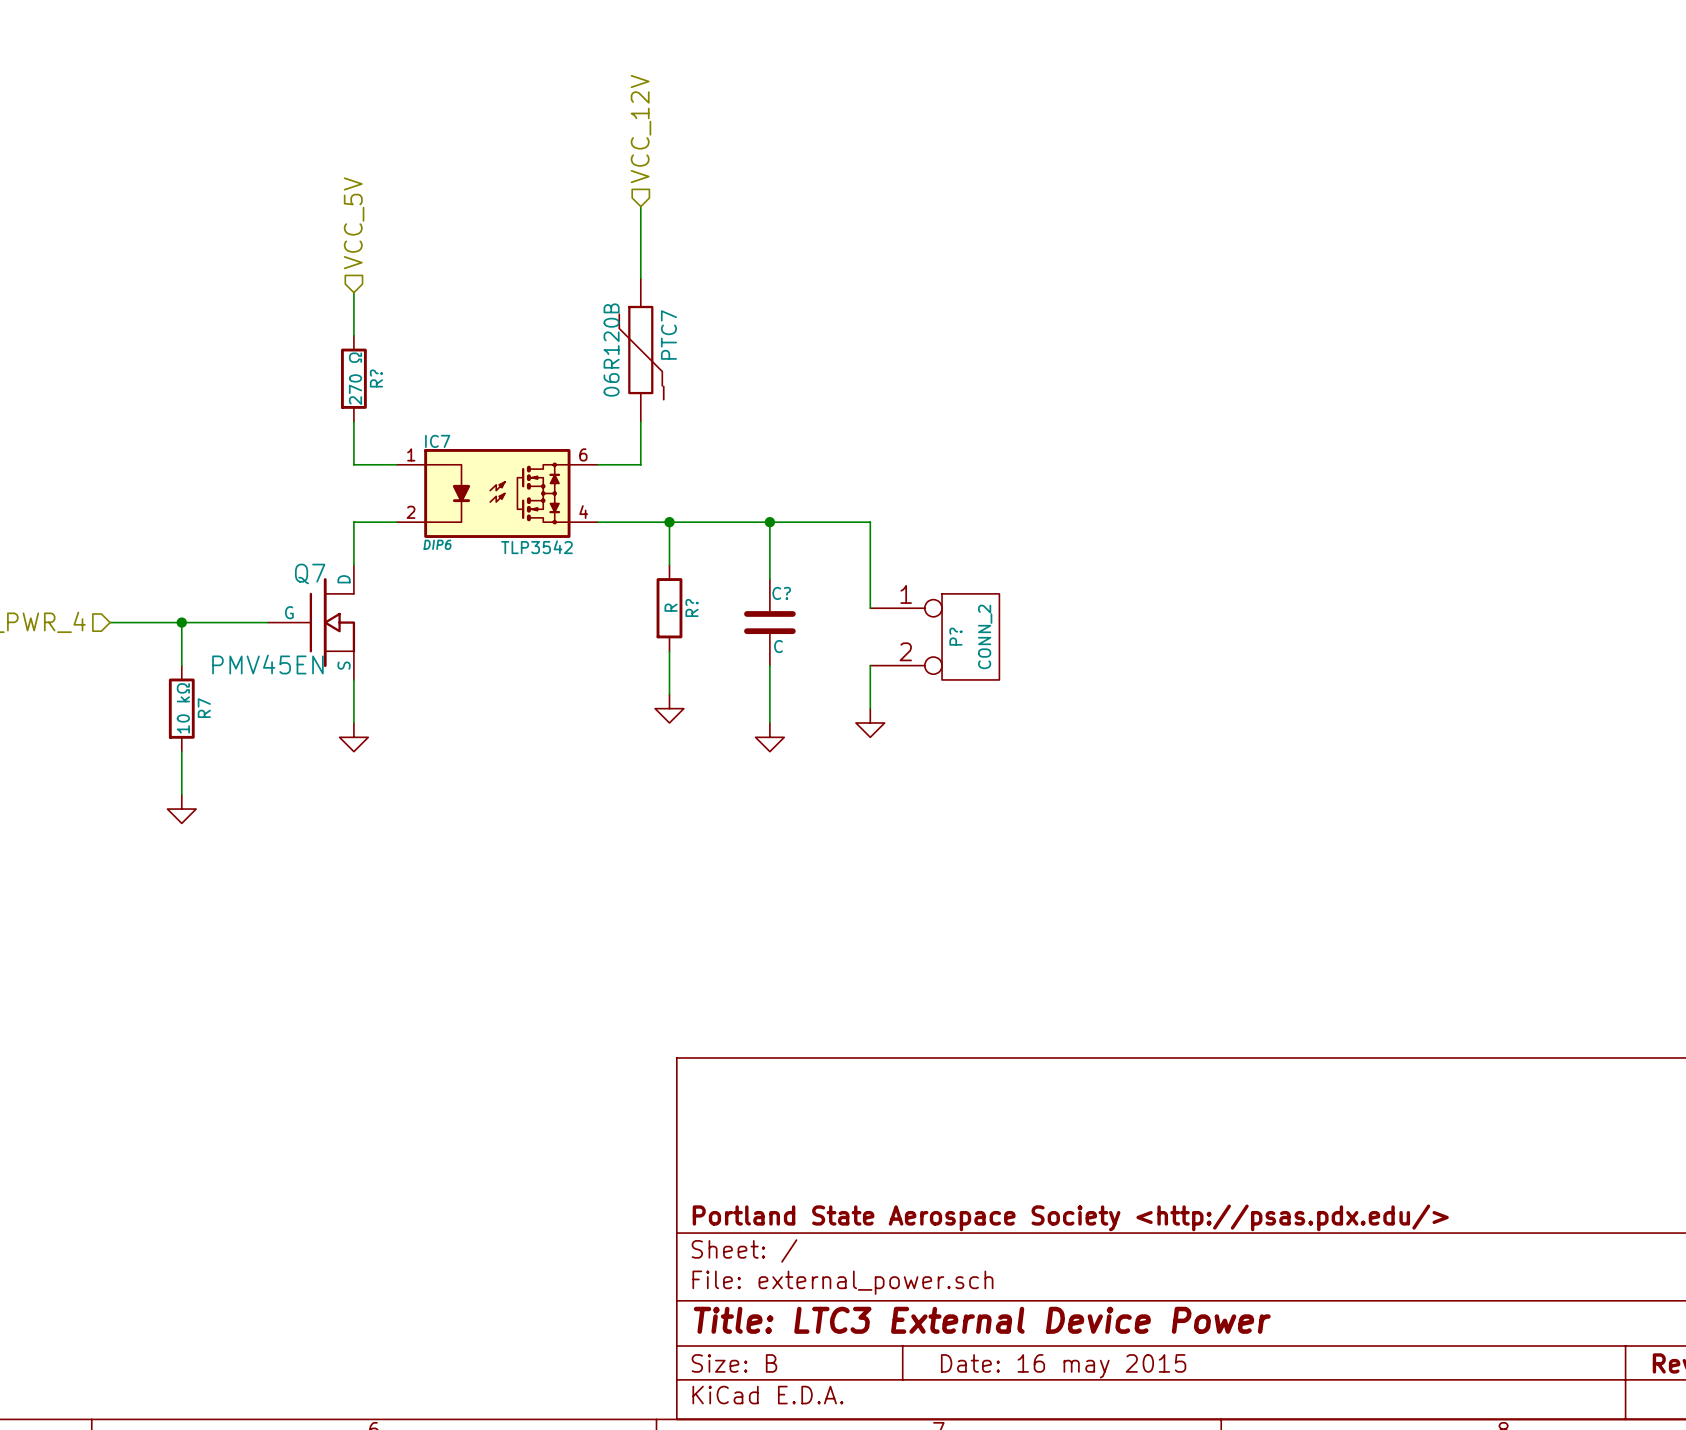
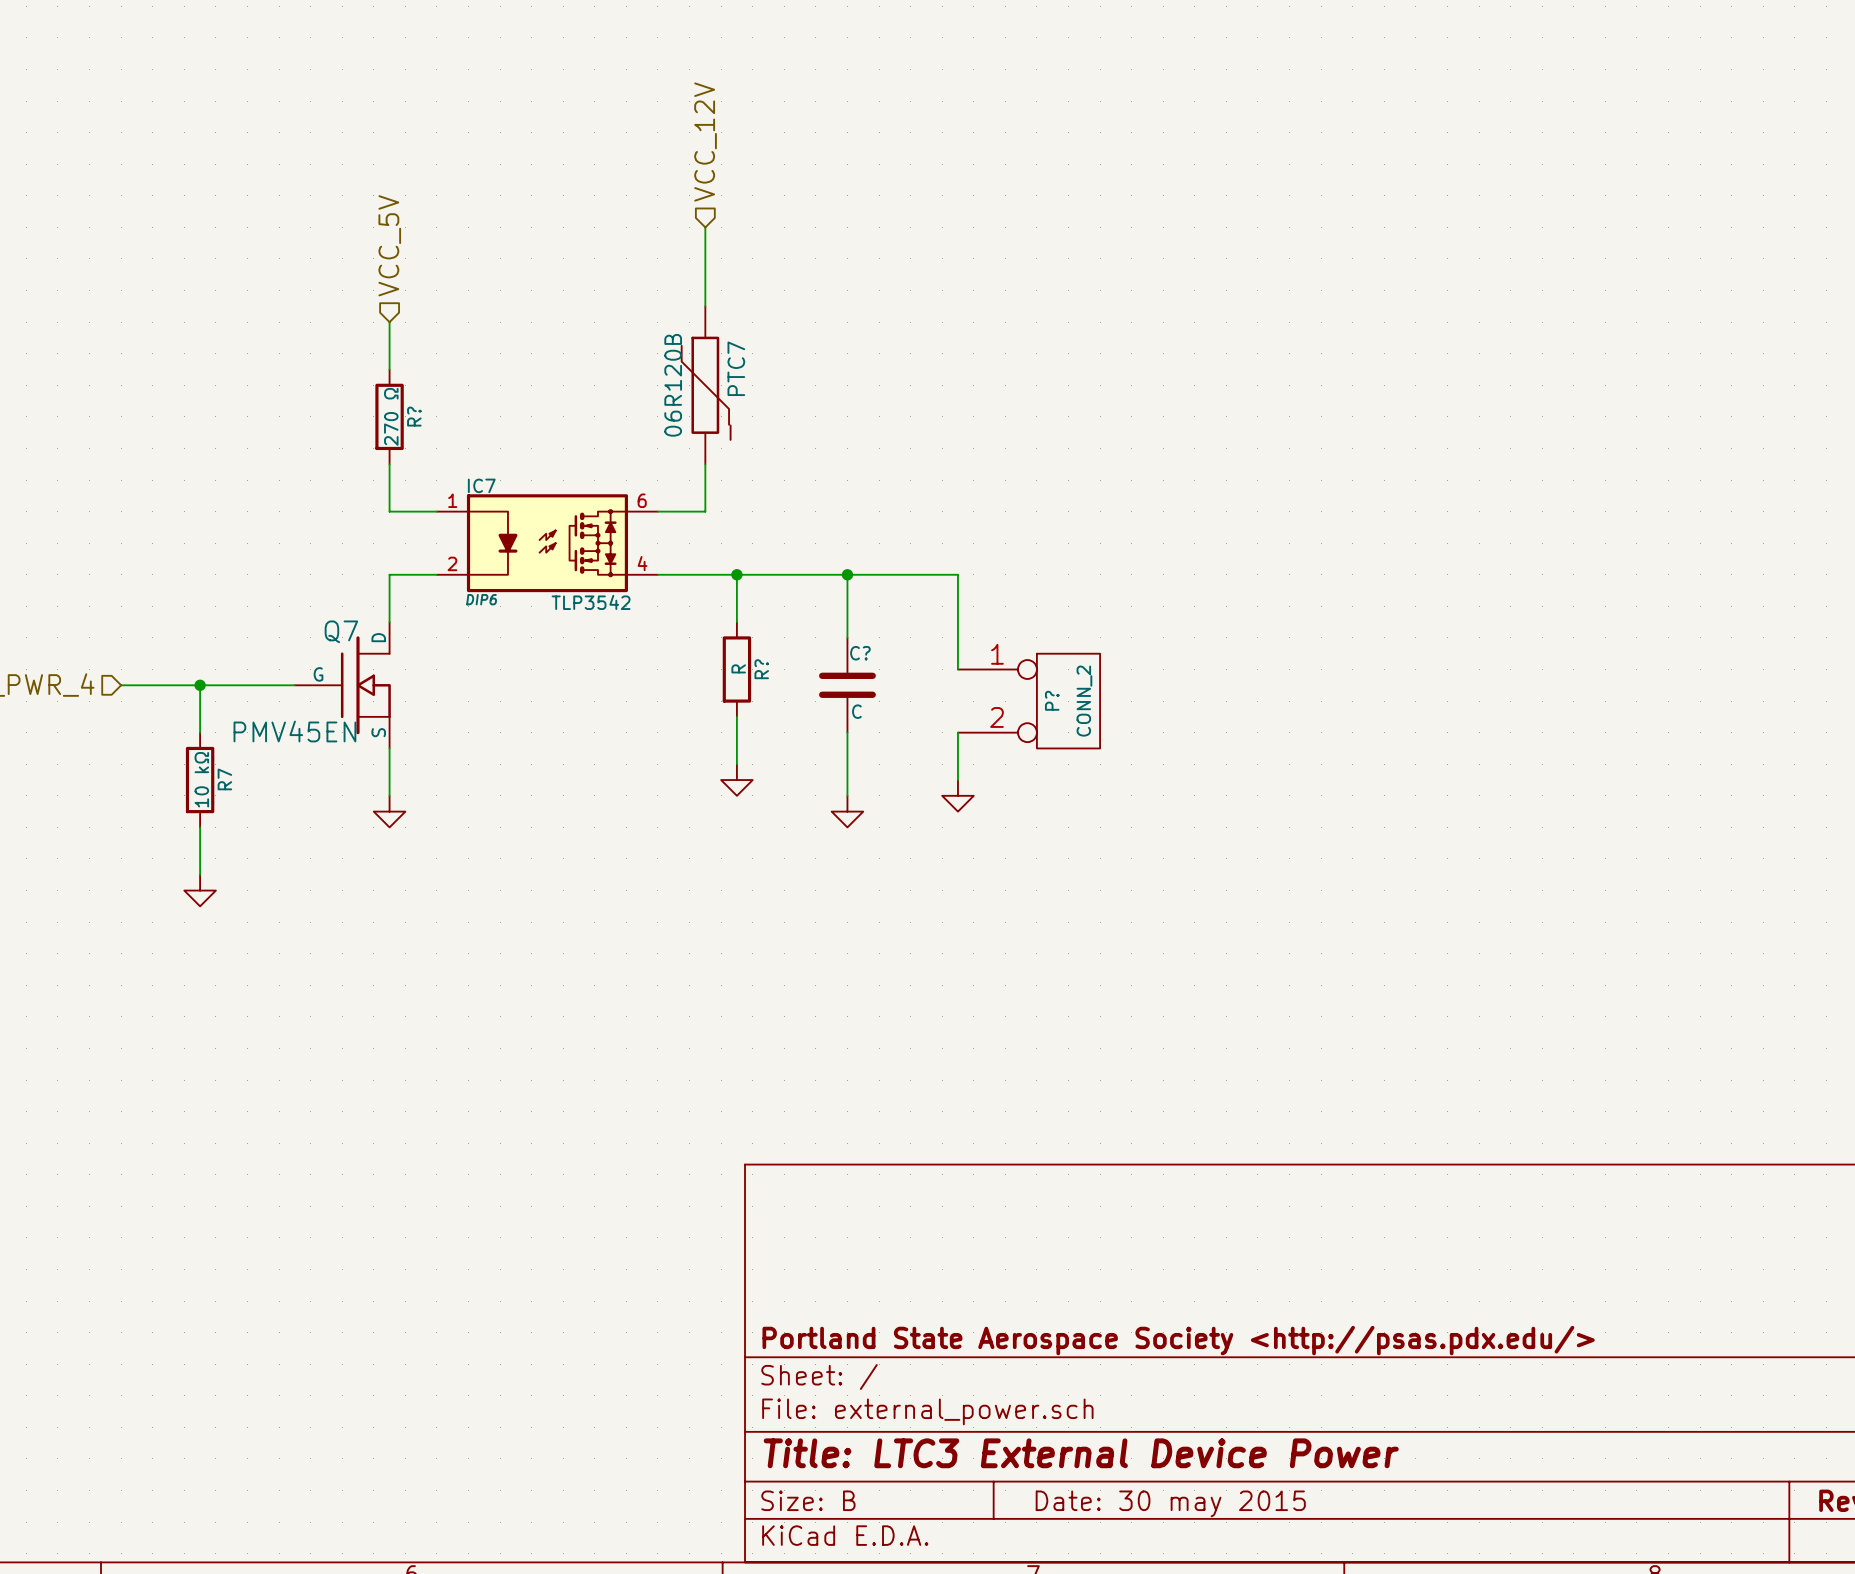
title block: Date: 16 may 2015 (1063, 1366) -> Date: 30 may 2015 (1170, 1503)

